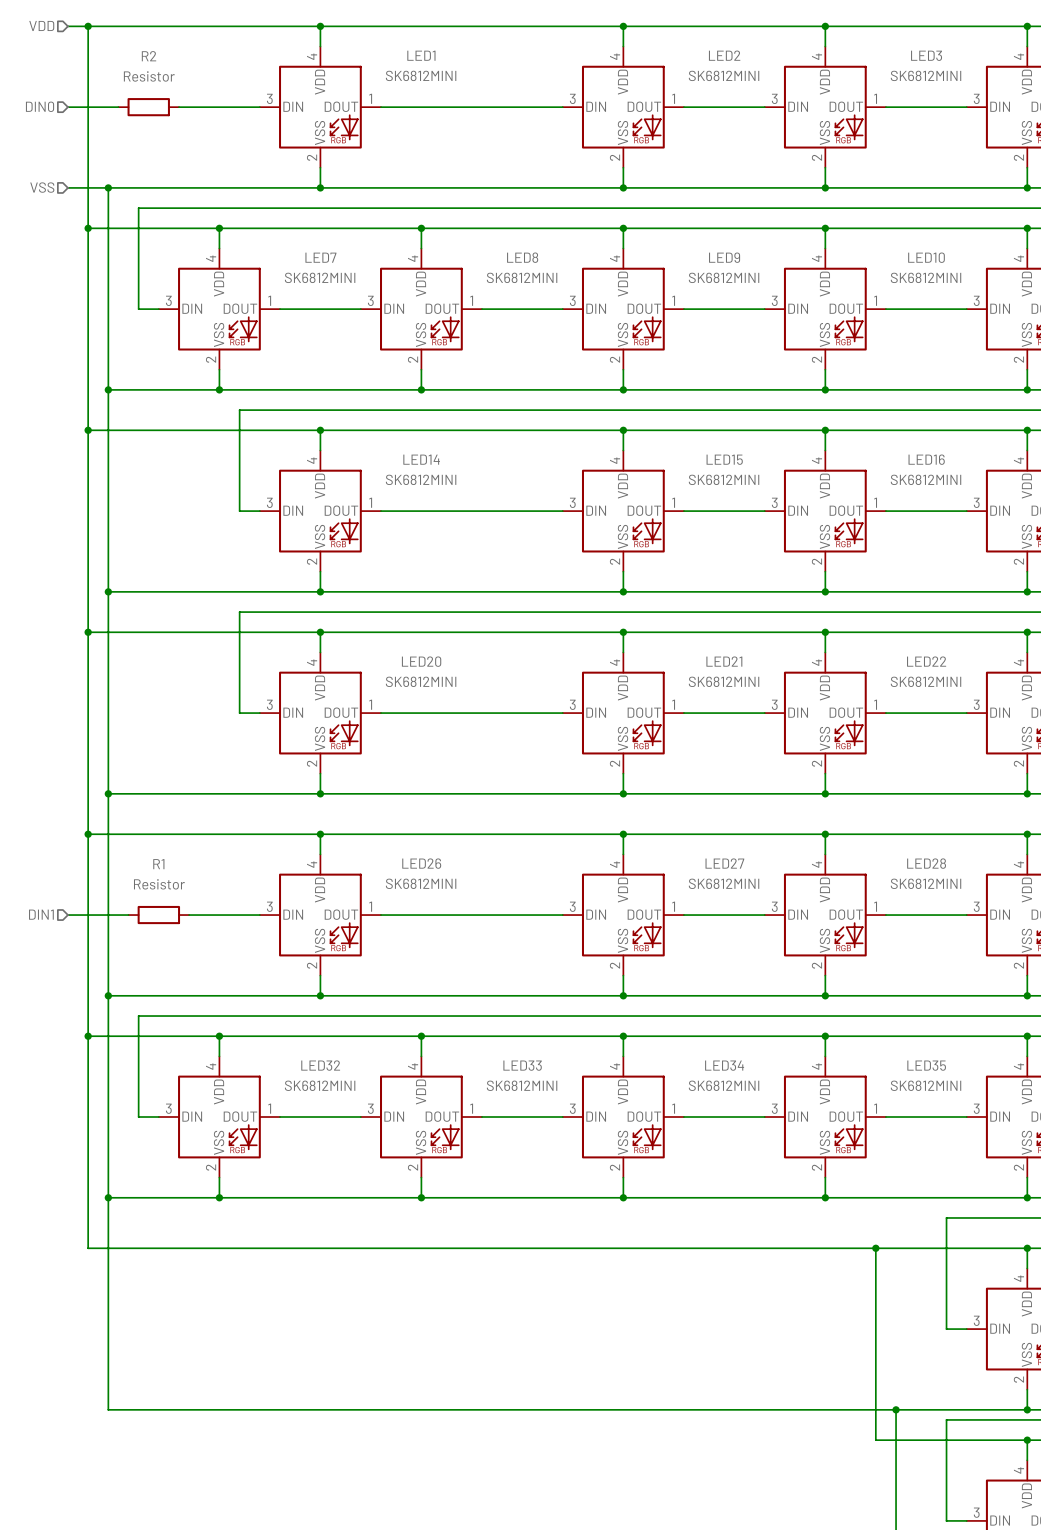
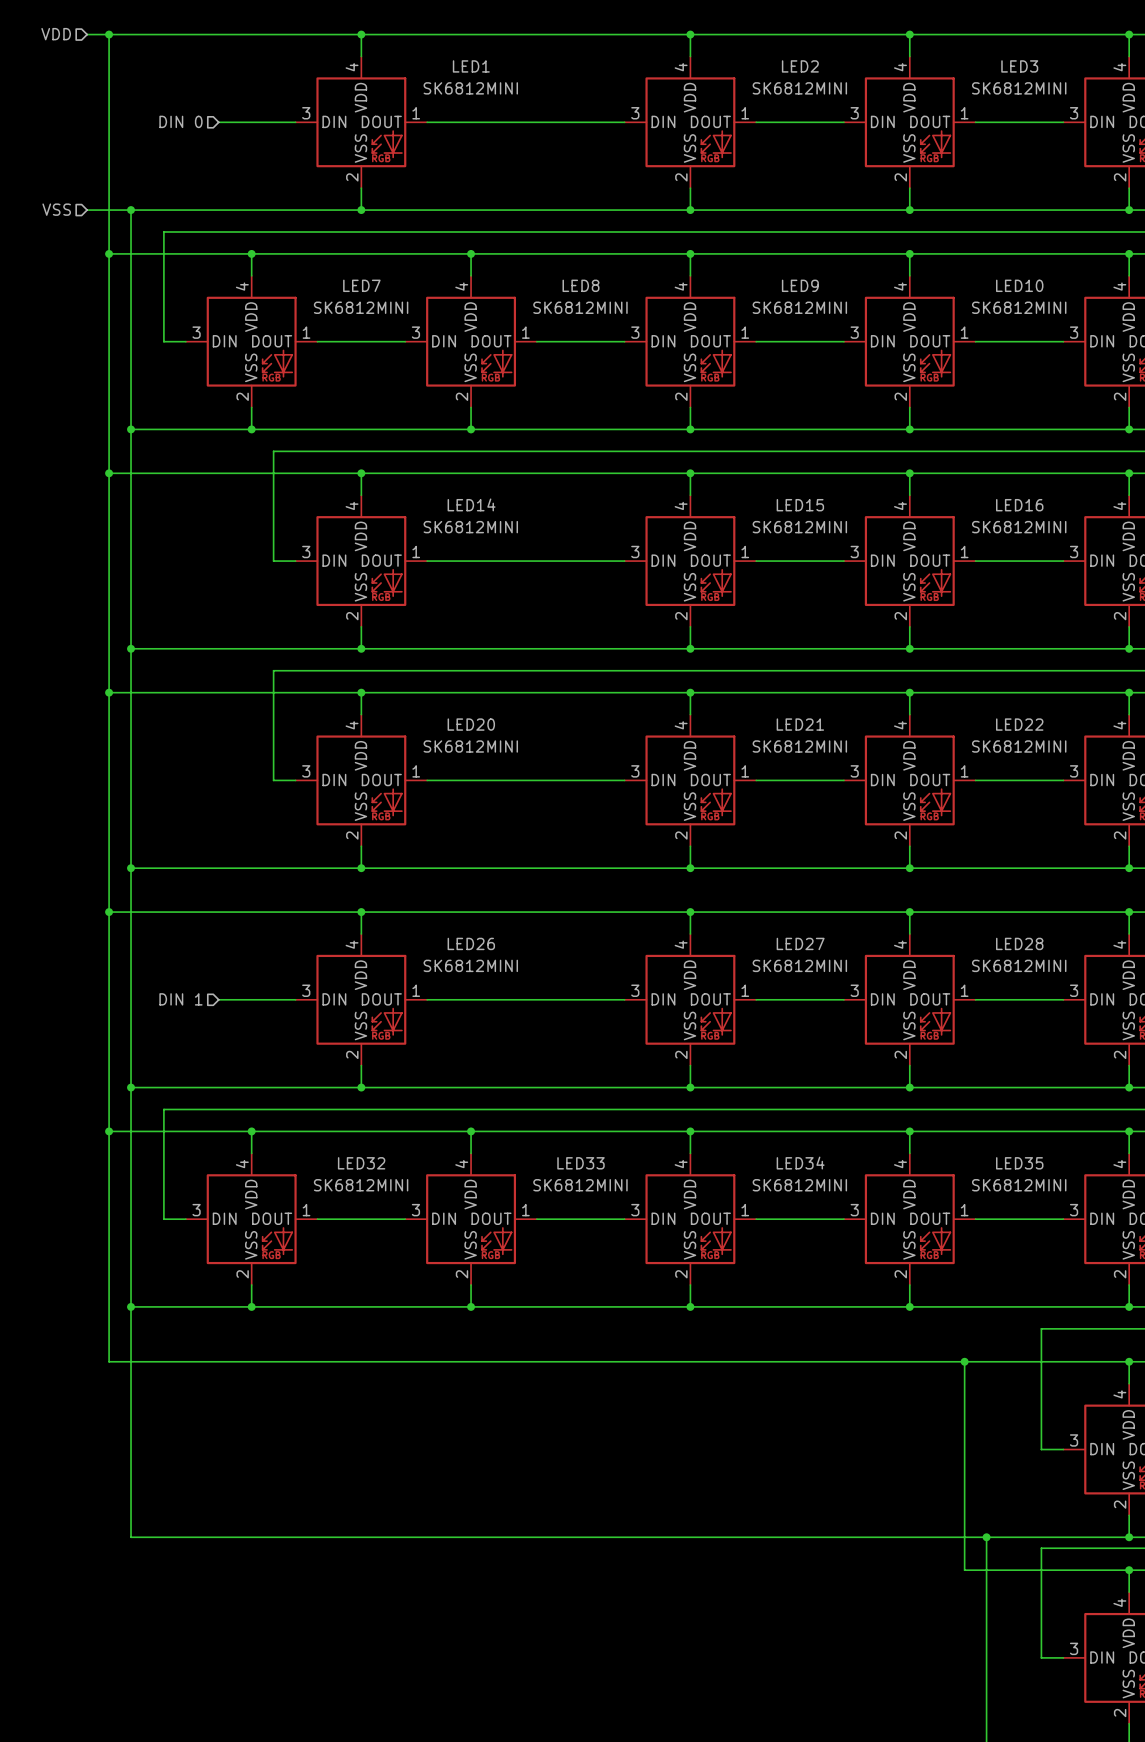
hierarchical label: DIN0 (40, 106) -> none
hierarchical label: none -> DIN 0 (180, 121)
wire: (67, 107) (118, 107) -> none
R2: Resistor (148, 107) -> none
wire: (179, 107) (189, 107) -> none
hierarchical label: DIN1 (41, 914) -> none
hierarchical label: none -> DIN 1 (180, 999)
wire: (67, 915) (128, 915) -> none
R1: Resistor (158, 915) -> none

